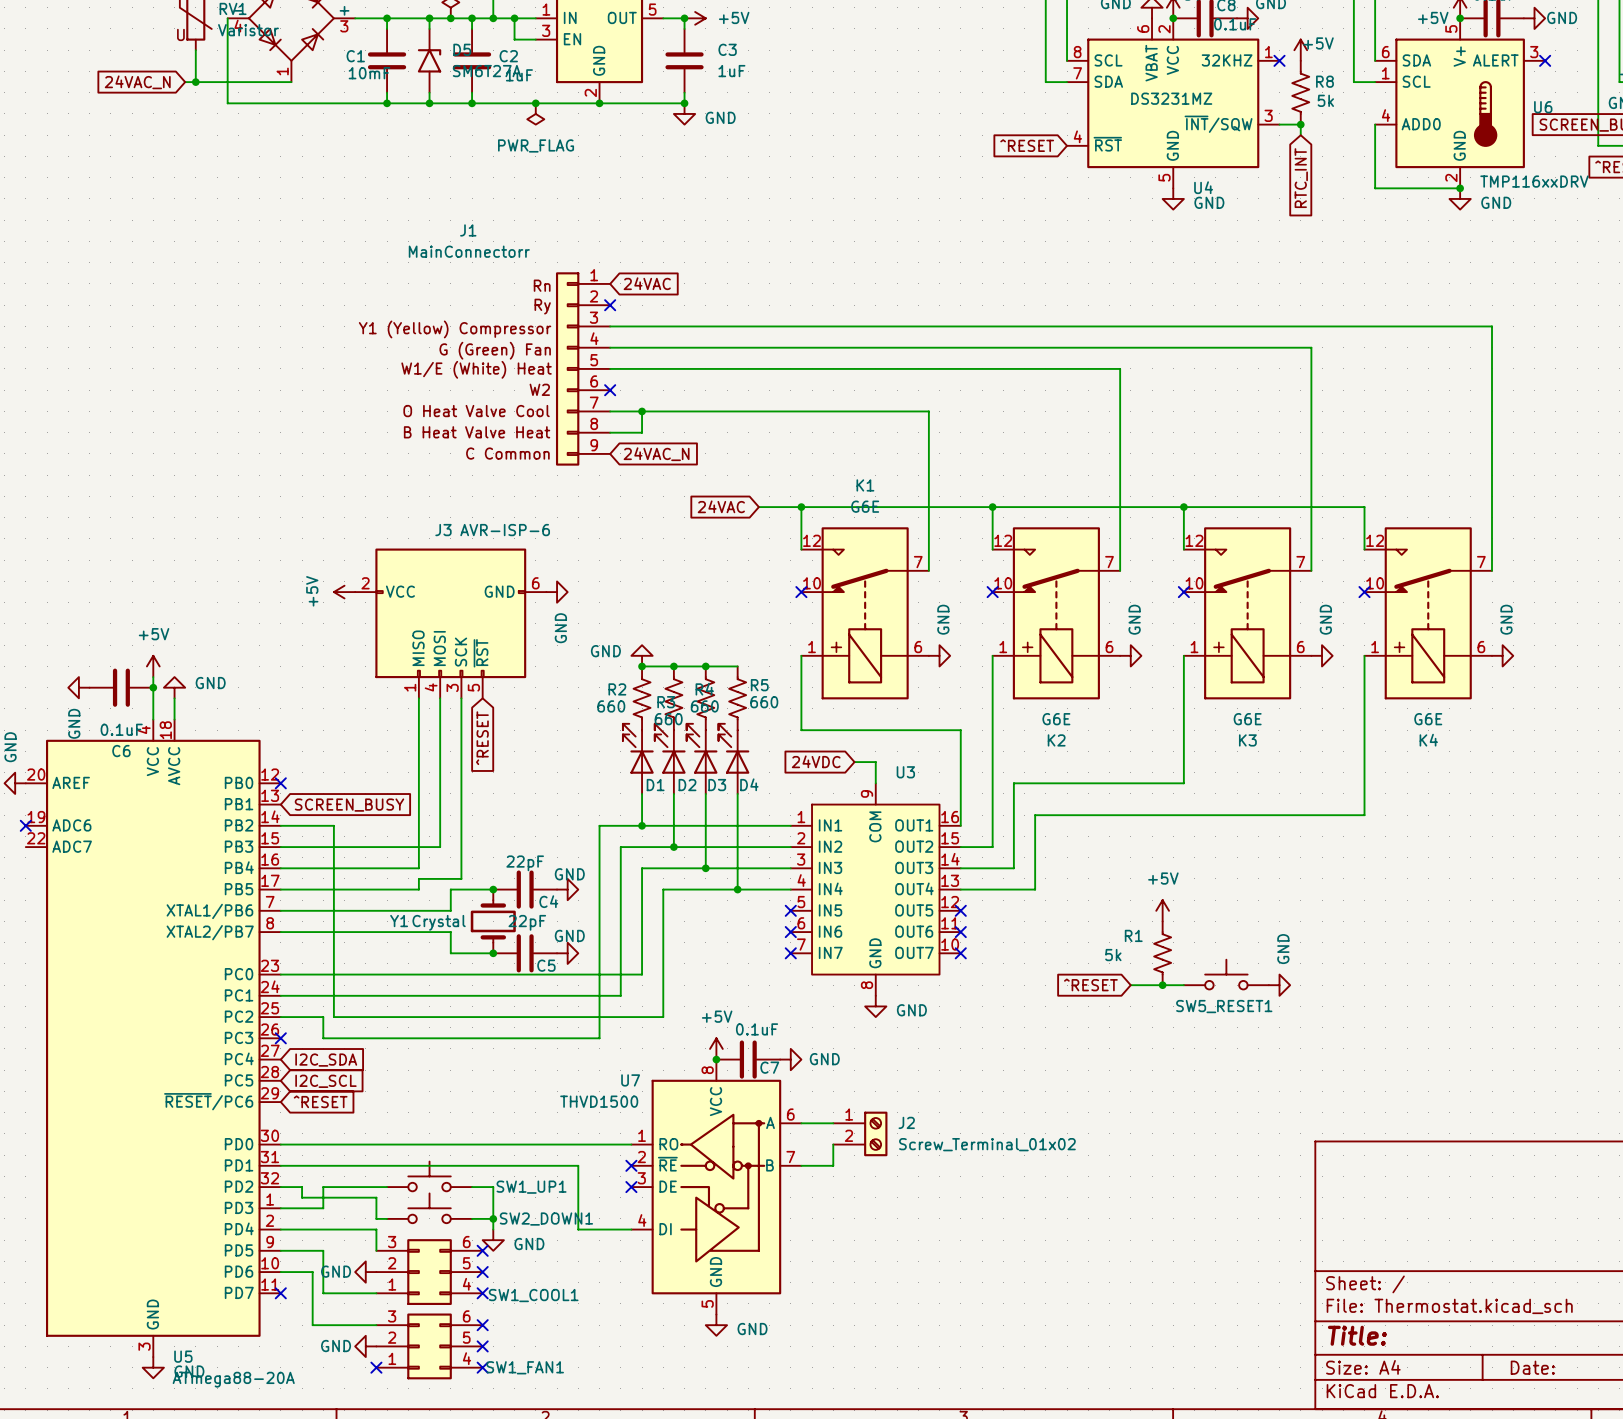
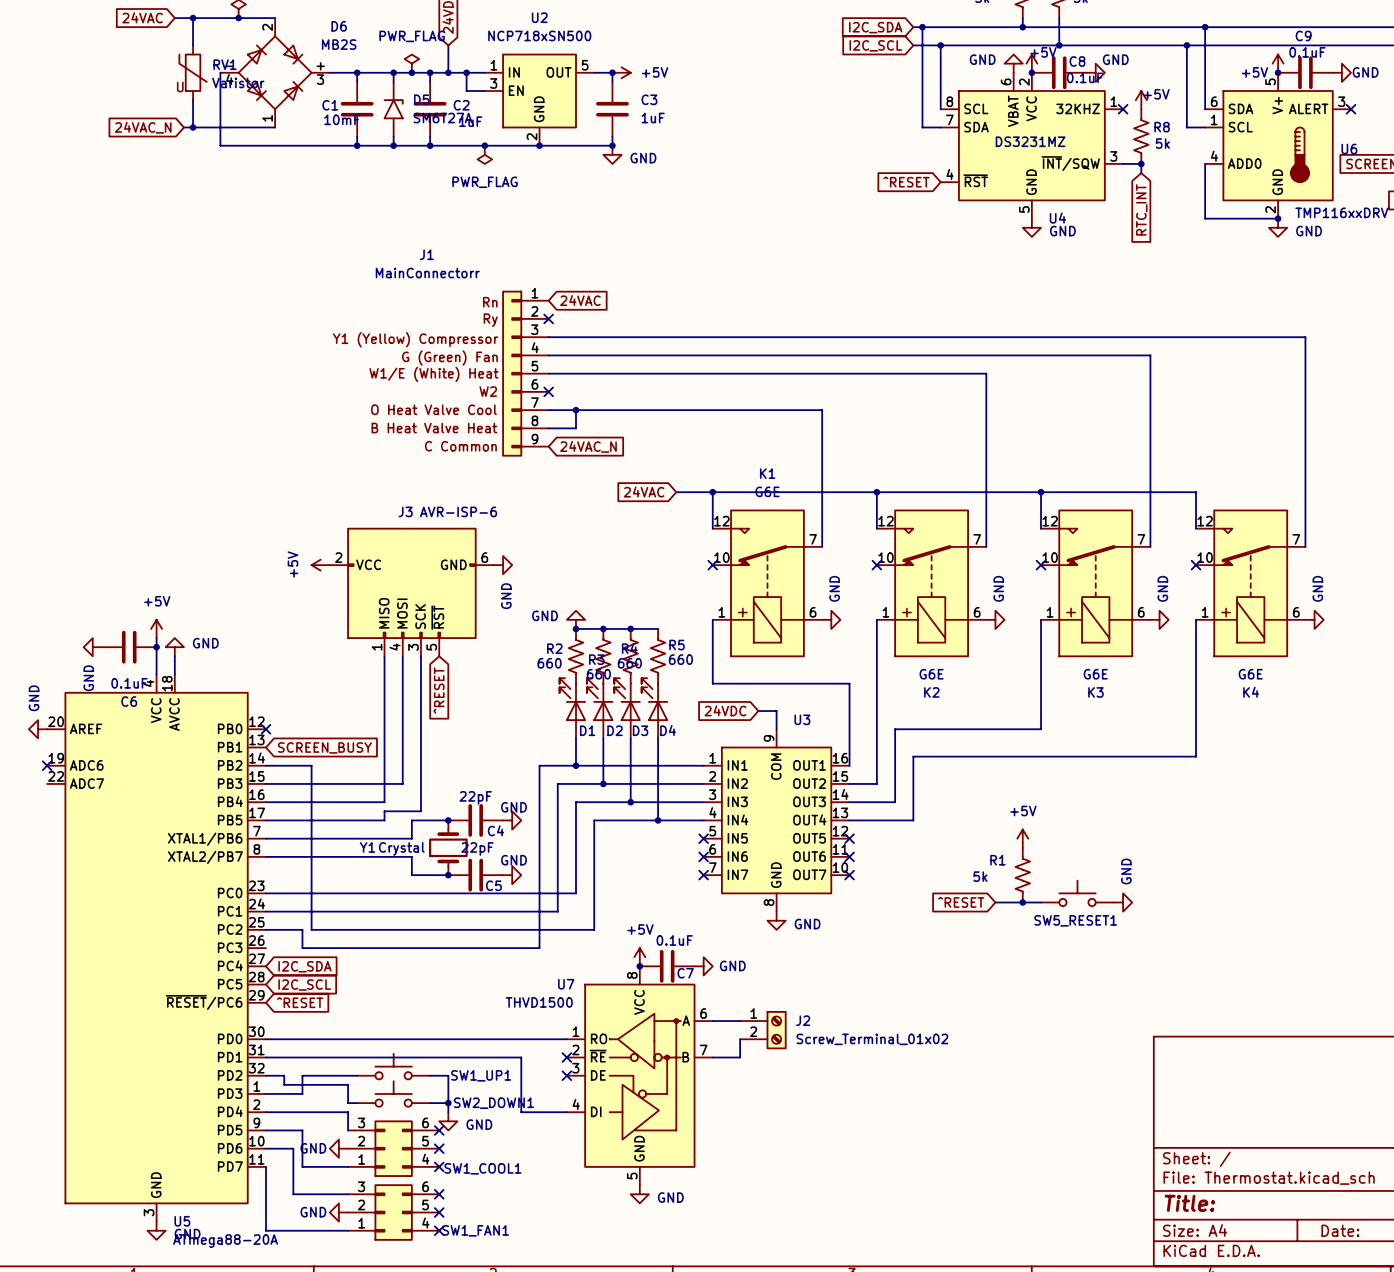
no-connect mark: (280, 1038) -> none
wire: none -> (265, 1166) (265, 1230) (348, 1230)
no-connect mark: (280, 1293) -> none
no-connect mark: (376, 1367) -> none

